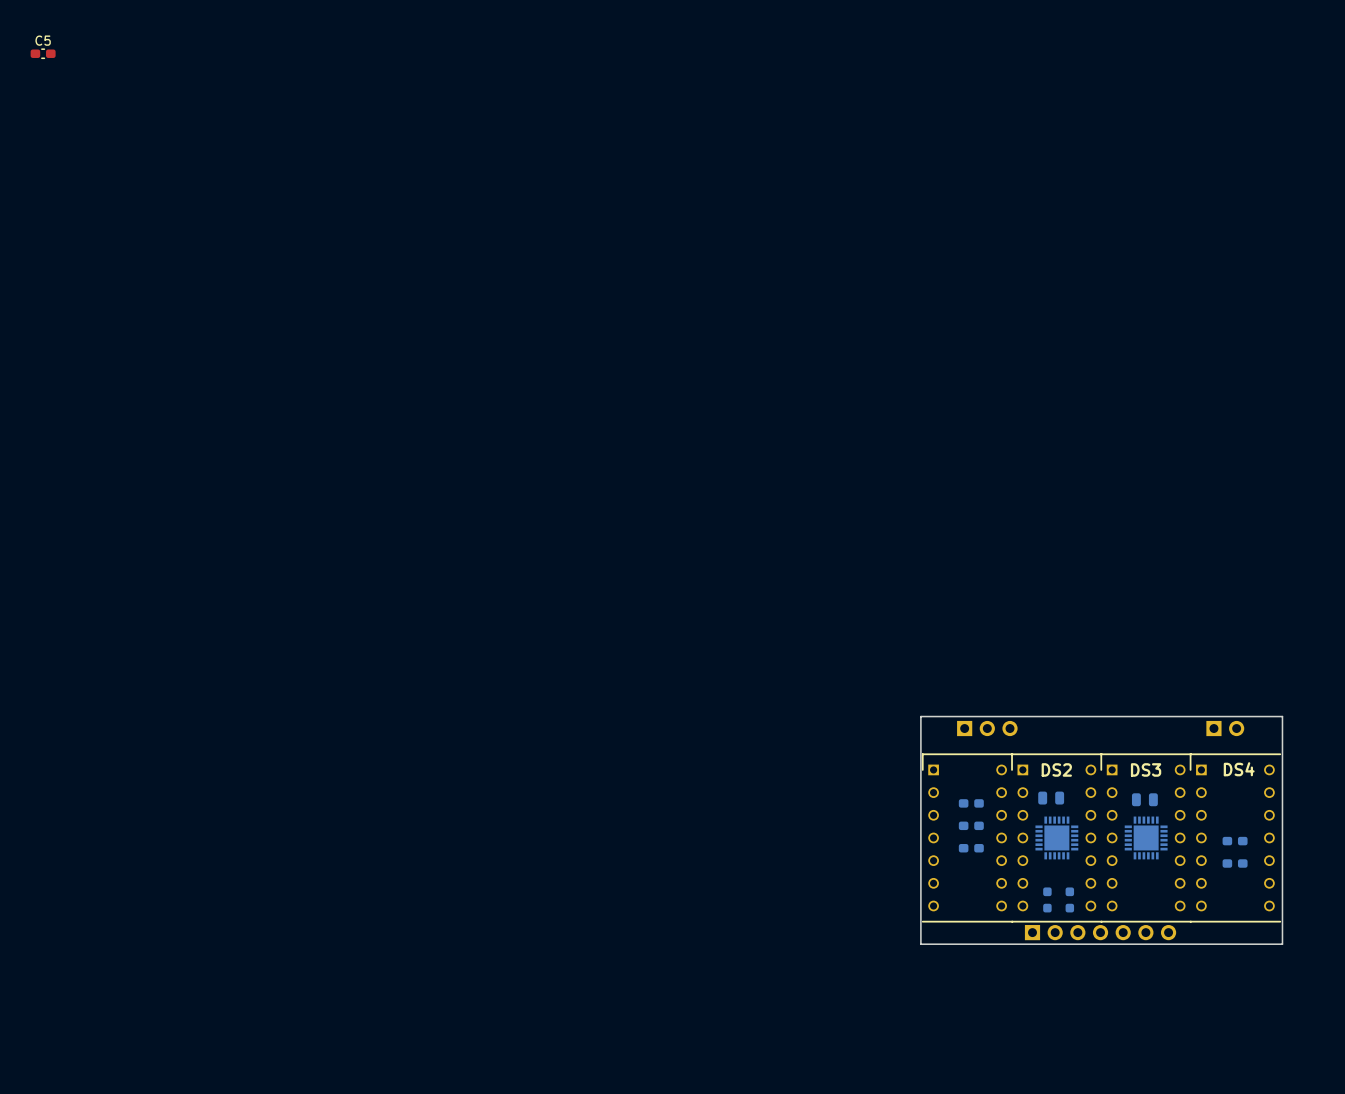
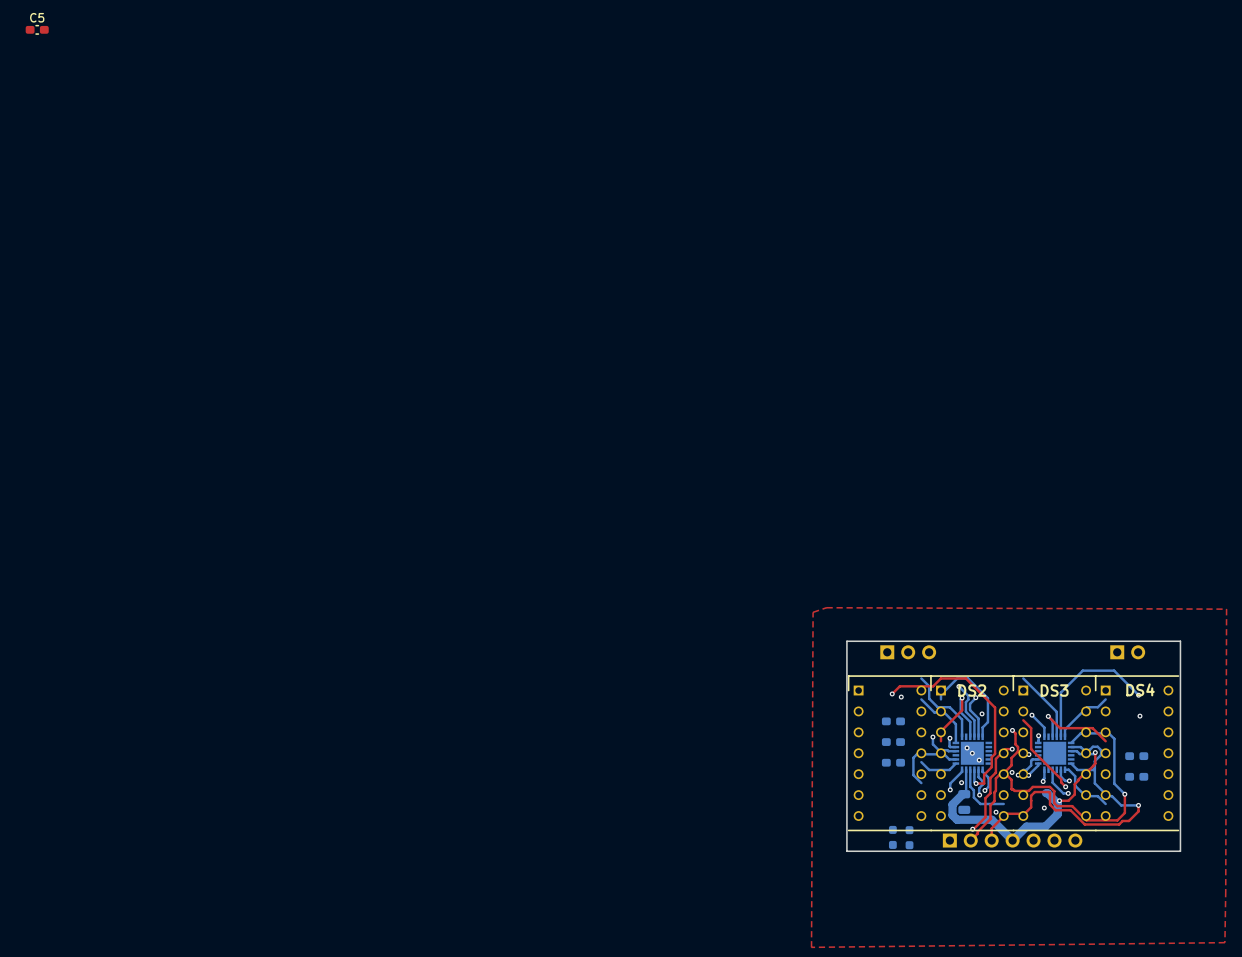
top zone outline: none -> (826, 607) (1226, 609) (1224, 942) (811, 947) (813, 612) (826, 607)
bottom track: none -> (921, 678) (929, 686) (929, 698) (937, 707) (949, 707) (962, 719) (962, 736)
bottom track: none -> (1023, 678) (1056, 711) (1056, 736)
bottom track: none -> (958, 686) (968, 695) (965, 711) (974, 720) (974, 736)
via: none -> (958, 686)
top track: none -> (892, 693) (899, 686) (933, 686) (940, 678) (965, 678) (995, 707) (995, 753) (991, 757) (991, 767) (984, 774) (984, 783) (976, 783)
via: none -> (892, 693)
bottom track: none -> (1138, 695) (1114, 670) (1082, 670) (1060, 692) (1060, 736)
via: none -> (1138, 695)
via: none -> (901, 697)
bottom track: none -> (975, 697) (970, 703) (970, 710) (978, 718) (978, 736)
via: none -> (975, 697)
top track: none -> (962, 697) (962, 710) (940, 731) (940, 741)
bottom track: none -> (962, 697) (960, 712) (970, 721) (970, 736)
via: none -> (962, 697)
bottom track: none -> (921, 699) (934, 712) (944, 712) (955, 724) (955, 742)
bottom track: none -> (940, 699) (940, 694) (957, 678) (967, 678) (987, 698) (987, 722) (982, 727) (982, 736)
bottom track: none -> (1105, 699) (1097, 707) (1087, 707) (1064, 729) (1064, 736)
via: none -> (982, 713)
bottom track: none -> (1031, 715) (1044, 727) (1044, 736)
via: none -> (1031, 715)
via: none -> (1139, 716)
part: (1051, 798) -> none
top track: none -> (1048, 716) (1060, 728) (1092, 728) (1105, 741)
bottom track: none -> (1048, 716) (1052, 720) (1052, 736)
via: none -> (1048, 716)
part: (1144, 799) -> none
top track: none -> (1023, 720) (1031, 728) (1031, 749) (1061, 779) (1061, 782) (1065, 786)
top track: none -> (1012, 730) (1015, 733) (1015, 744) (1018, 747) (1018, 751) (1011, 757) (1011, 765) (1006, 770) (1006, 774) (1011, 779) (1011, 789) (1028, 790) (1032, 786) (1049, 786) (1054, 791) (1054, 803) (1057, 806) (1072, 806) (1086, 820) (1117, 820) (1124, 812) (1124, 794)
via: none -> (1012, 730)
bottom track: none -> (1038, 735) (1038, 742)
via: none -> (1038, 735)
bottom track: none -> (932, 737) (932, 744) (938, 750) (955, 751)
via: none -> (932, 737)
bottom track: none -> (949, 738) (949, 746) (955, 747)
via: none -> (949, 738)
bottom track: none -> (1071, 742) (1080, 733) (1108, 733) (1114, 738) (1114, 783) (1124, 794)
bottom track: none -> (1071, 747) (1089, 749) (1092, 746) (1097, 746) (1101, 750) (1101, 754) (1094, 761) (1094, 783) (1107, 796) (1111, 796) (1121, 805) (1138, 805)
via: none -> (967, 747)
top track: none -> (1012, 749) (1005, 749) (995, 758) (995, 772) (990, 778) (990, 793) (985, 798) (985, 817) (972, 829)
via: none -> (1012, 749)
bottom track: none -> (1071, 751) (1076, 751) (1079, 754) (1095, 752)
via: none -> (972, 753)
top track: none -> (1095, 752) (1095, 763) (1074, 784) (1074, 794) (1068, 800) (1059, 800)
via: none -> (1095, 752)
via: none -> (1028, 754)
bottom track: none -> (955, 759) (949, 759) (944, 754) (916, 754) (913, 757) (913, 775) (921, 783)
bottom track: none -> (1038, 759) (1032, 759) (1031, 765) (1018, 775)
via: none -> (979, 760)
bottom track: none -> (921, 762) (929, 769) (949, 769) (955, 763)
bottom track: none -> (1038, 763) (1028, 775)
bottom track: none -> (1071, 763) (1077, 769) (1094, 768)
bottom track: none -> (962, 769) (950, 783) (950, 789)
bottom track: none -> (966, 769) (966, 792) (952, 804) (952, 815) (957, 819) (991, 819) (1012, 840) (1026, 826) (1045, 826) (1057, 814) (1057, 803) (1046, 793)
bottom track: none -> (970, 769) (970, 786) (973, 790) (973, 797) (980, 803) (1003, 803)
bottom track: none -> (974, 769) (976, 783)
bottom track: none -> (978, 769) (978, 777) (982, 781) (982, 784) (979, 788) (979, 795)
bottom track: none -> (982, 769) (988, 777) (988, 786) (984, 790)
bottom track: none -> (1044, 769) (1043, 781)
bottom track: none -> (1052, 769) (1052, 782) (1063, 793) (1068, 793)
bottom track: none -> (1060, 769) (1060, 776) (1065, 780) (1069, 780)
bottom track: none -> (1064, 769) (1068, 769) (1075, 776) (1075, 785) (1085, 796) (1097, 796) (1105, 803)
via: none -> (1012, 772)
top track: none -> (1006, 773) (1001, 773) (995, 778) (994, 801) (990, 805) (990, 819)
via: none -> (1018, 775)
via: none -> (1028, 775)
via: none -> (1069, 780)
via: none -> (1043, 781)
via: none -> (961, 782)
via: none -> (976, 783)
via: none -> (1065, 786)
via: none -> (950, 789)
via: none -> (984, 790)
via: none -> (1068, 793)
via: none -> (1124, 794)
via: none -> (979, 795)
via: none -> (1059, 800)
part: none -> (964, 802)
top track: none -> (1138, 805) (1138, 811) (1128, 820) (1122, 820) (1119, 824) (1084, 824) (1070, 810) (1055, 810) (1050, 804) (1049, 792) (1034, 792) (1031, 795) (1031, 807) (1024, 813) (1006, 813) (991, 828) (991, 840)
via: none -> (1138, 805)
via: none -> (1044, 808)
part: (1047, 899) -> none
part: (1069, 899) -> none
via: none -> (996, 812)
top track: none -> (991, 818) (970, 840)
via: none -> (972, 829)
part: none -> (892, 837)
part: none -> (909, 837)

